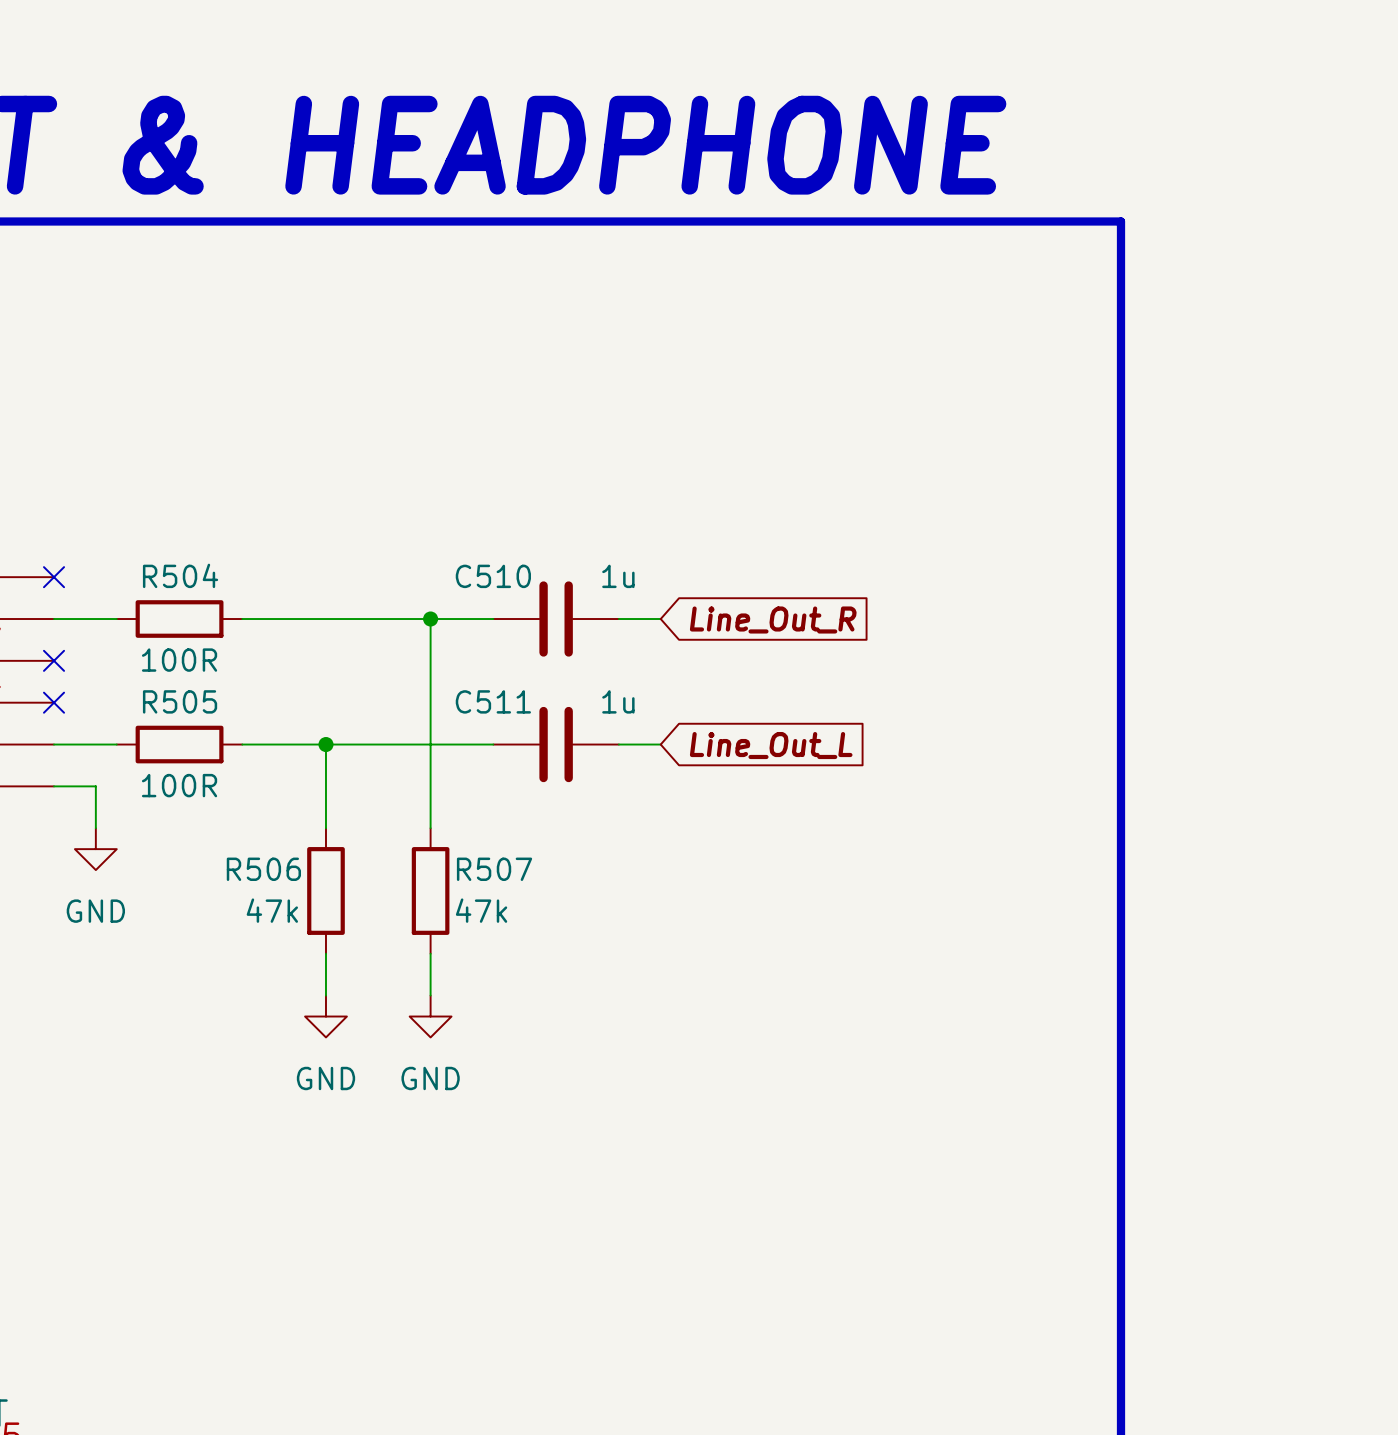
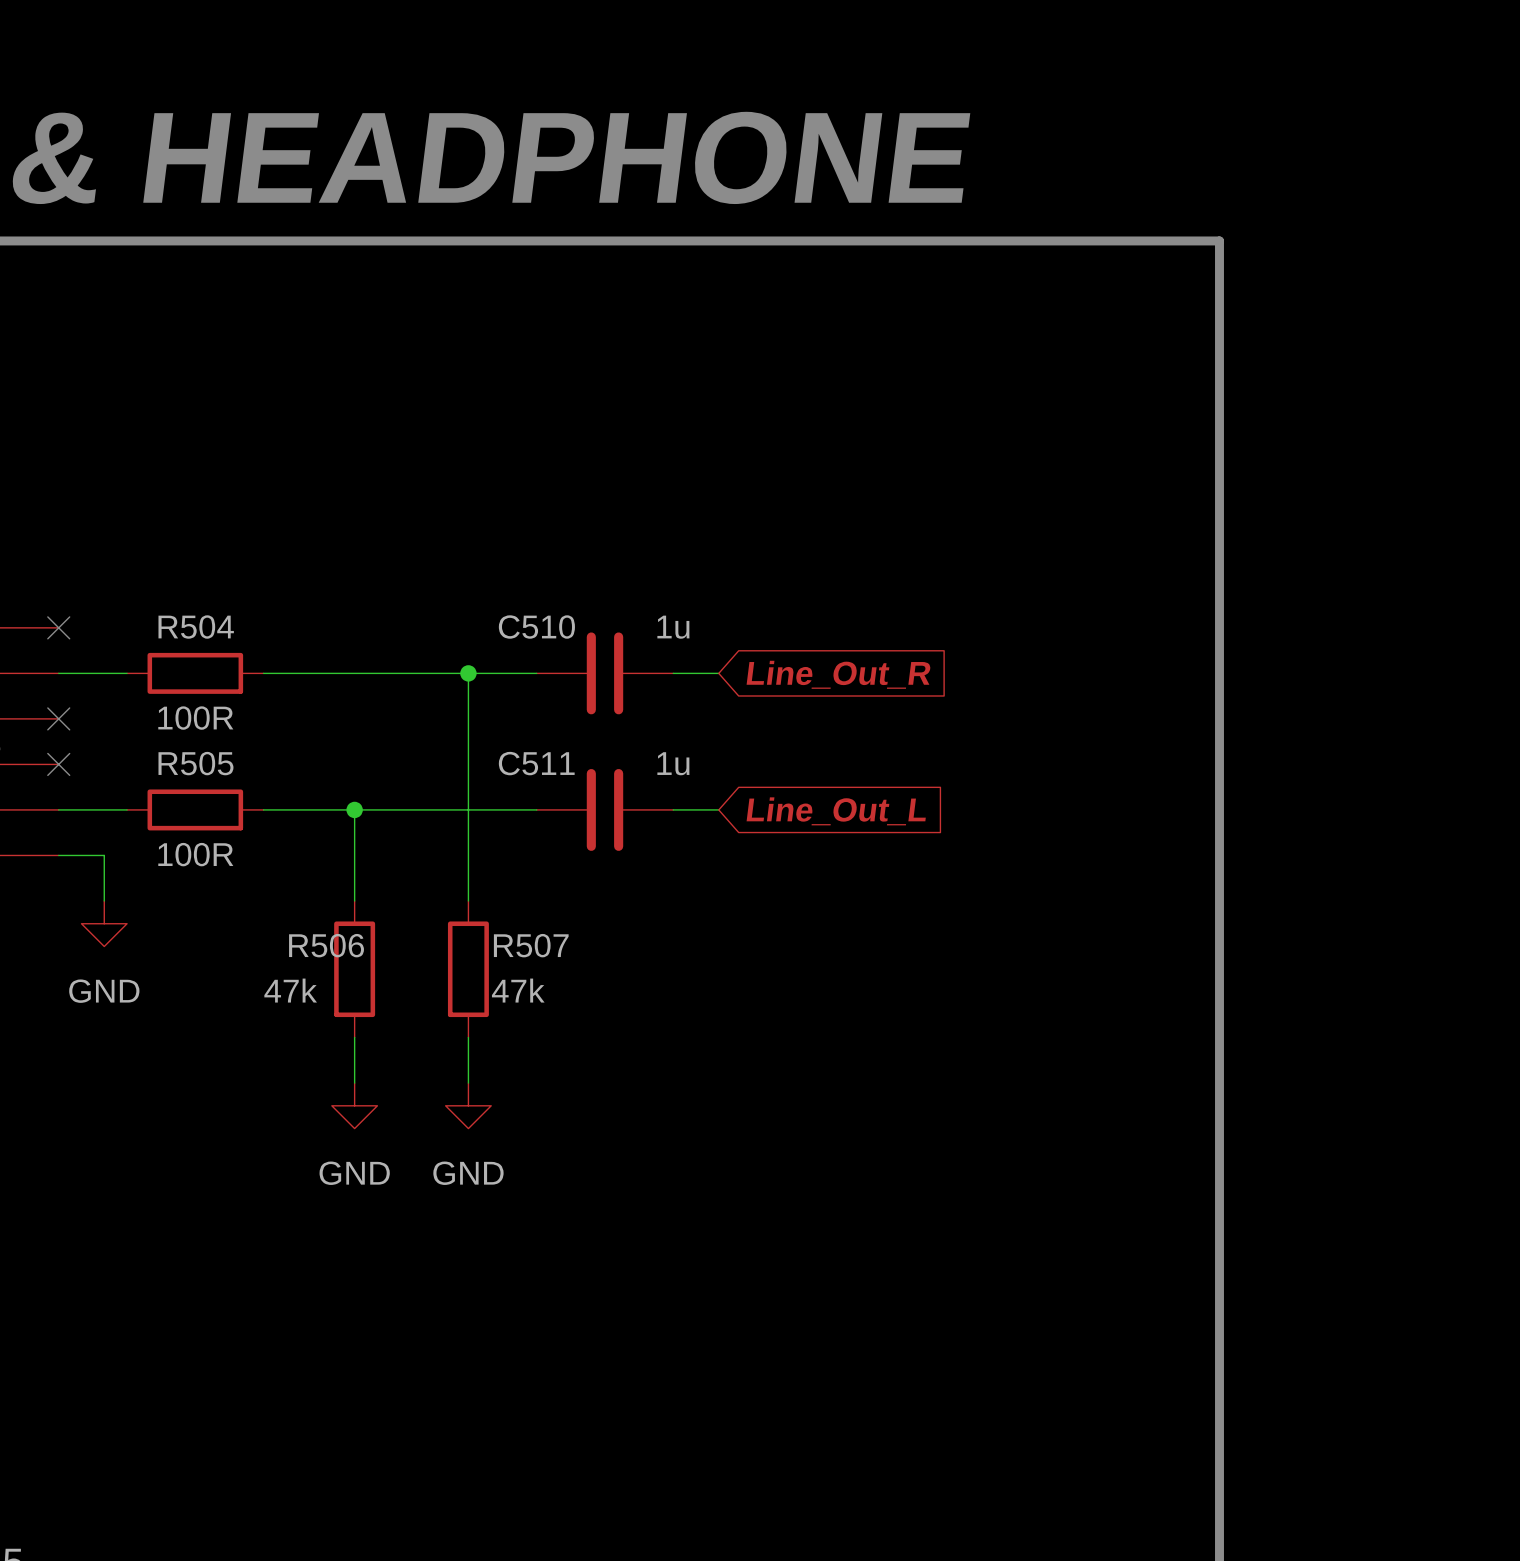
R506 name position: R506 (263, 869) -> R506 (326, 945)

